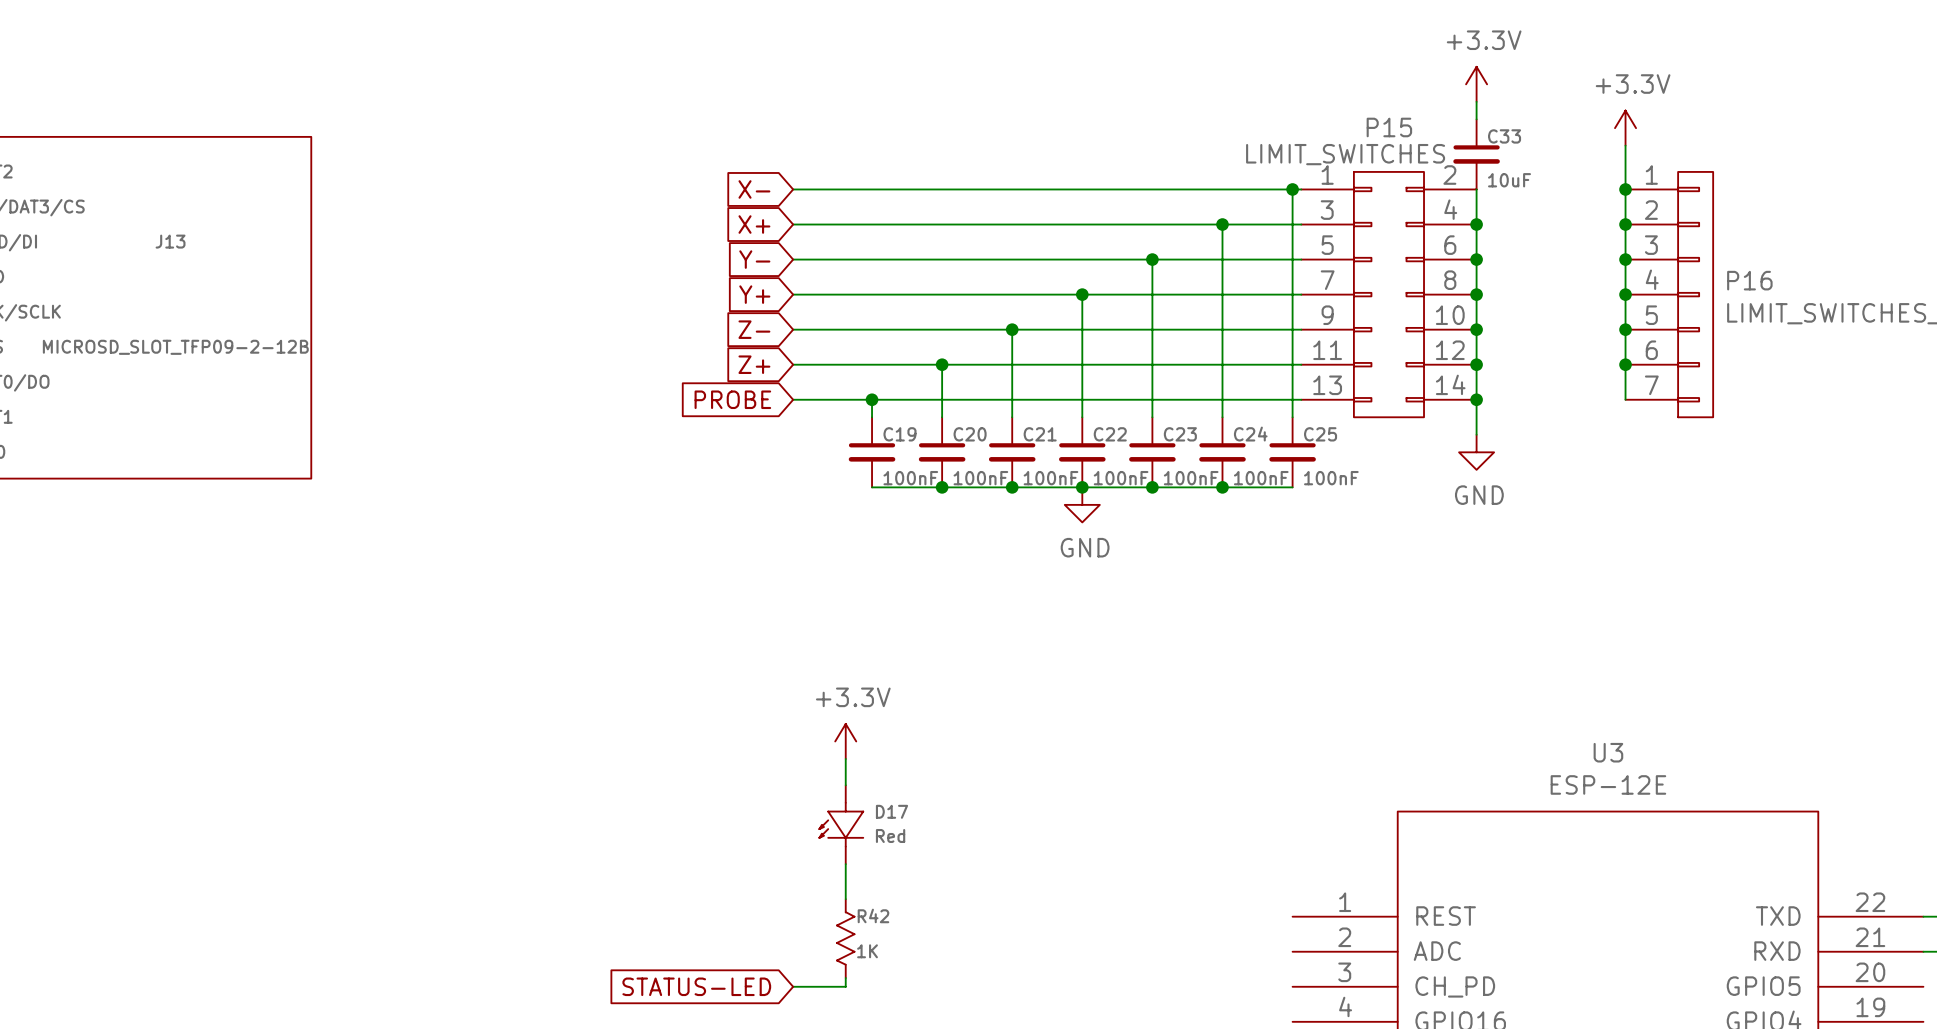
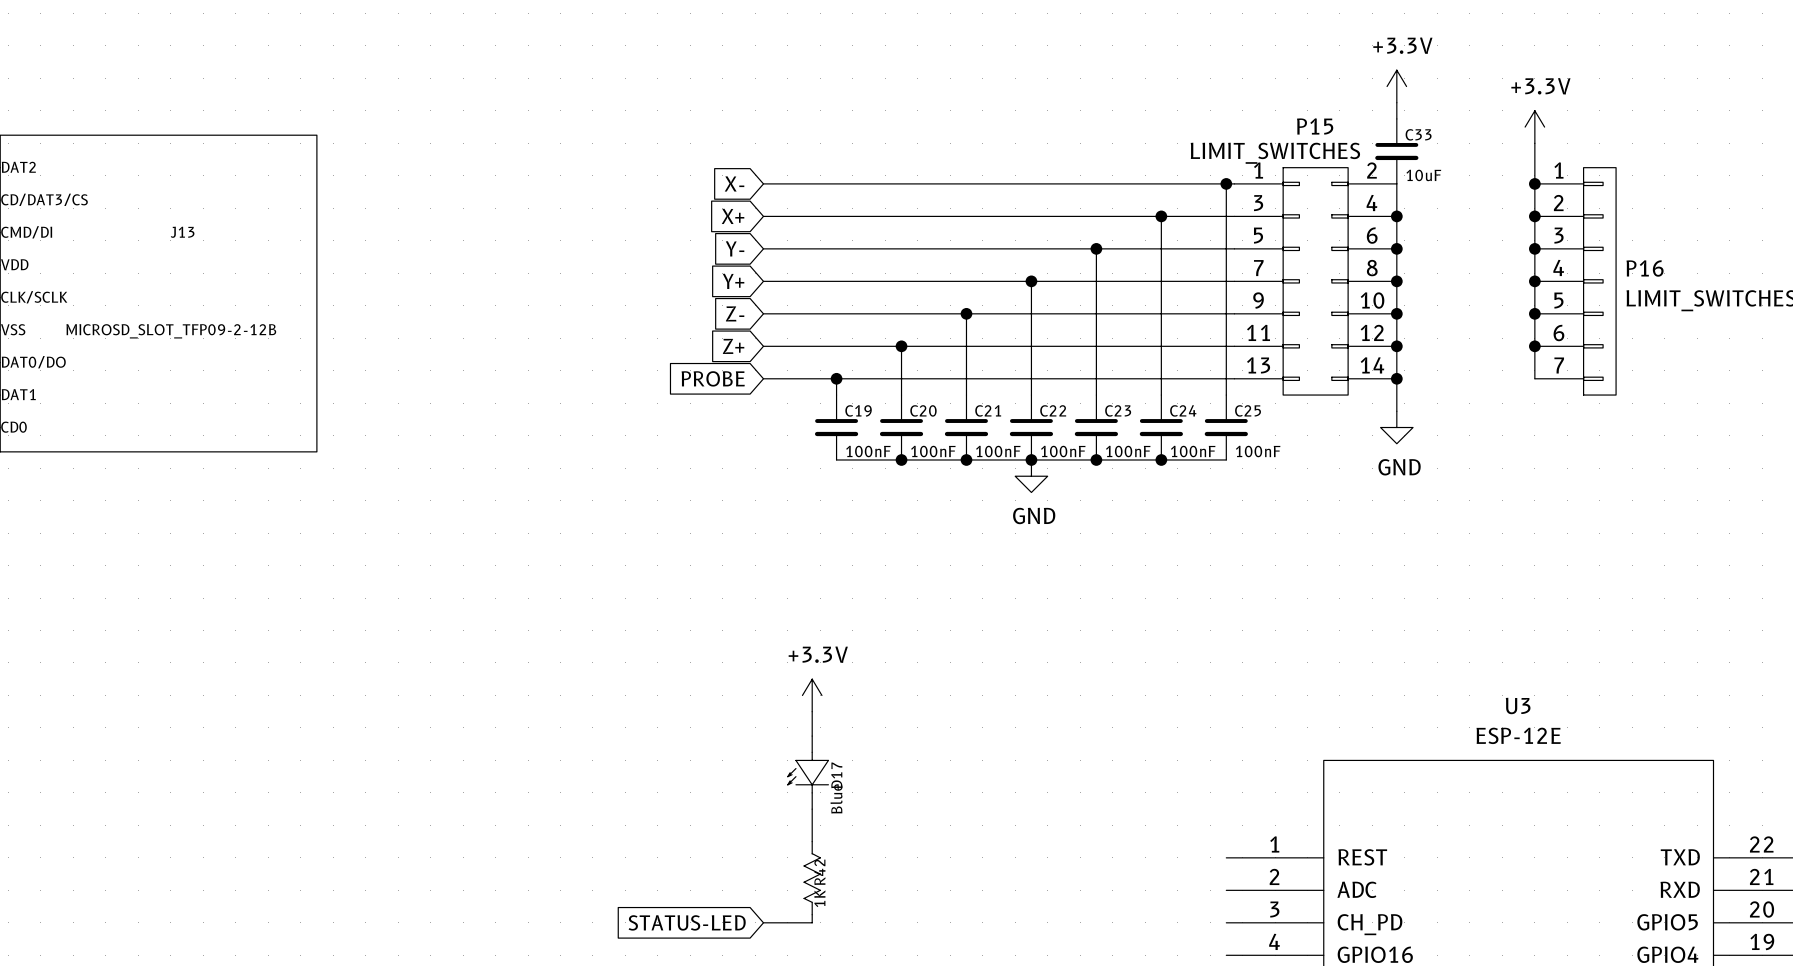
D17 name rotation: 0° (891, 811) -> 90° counterclockwise (836, 775)
D17 value: Red (890, 835) -> Blue (836, 798)
R42 name rotation: 0° (873, 915) -> 90° counterclockwise (819, 872)
R42 value rotation: 0° (867, 951) -> 90° counterclockwise (819, 898)

